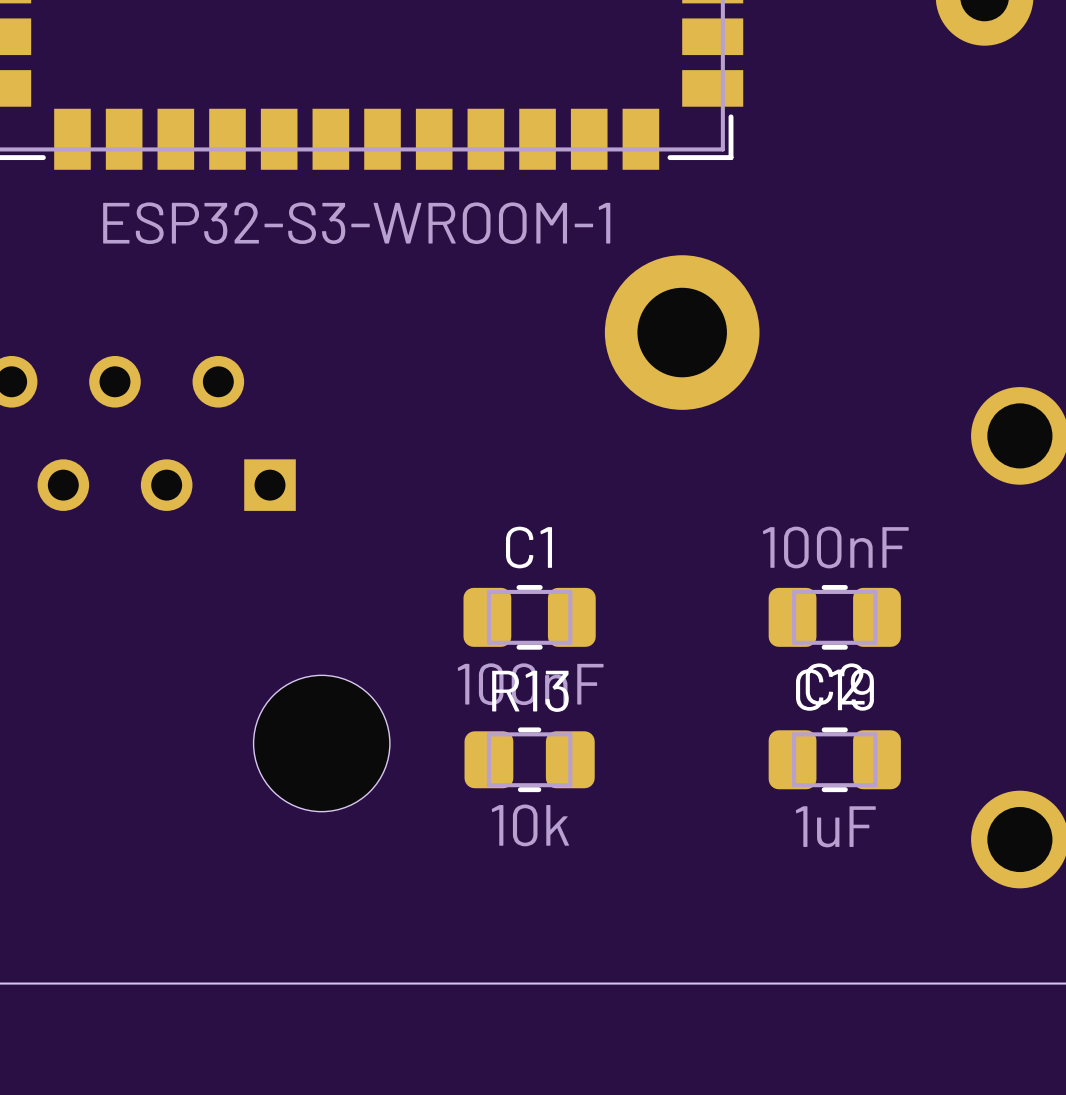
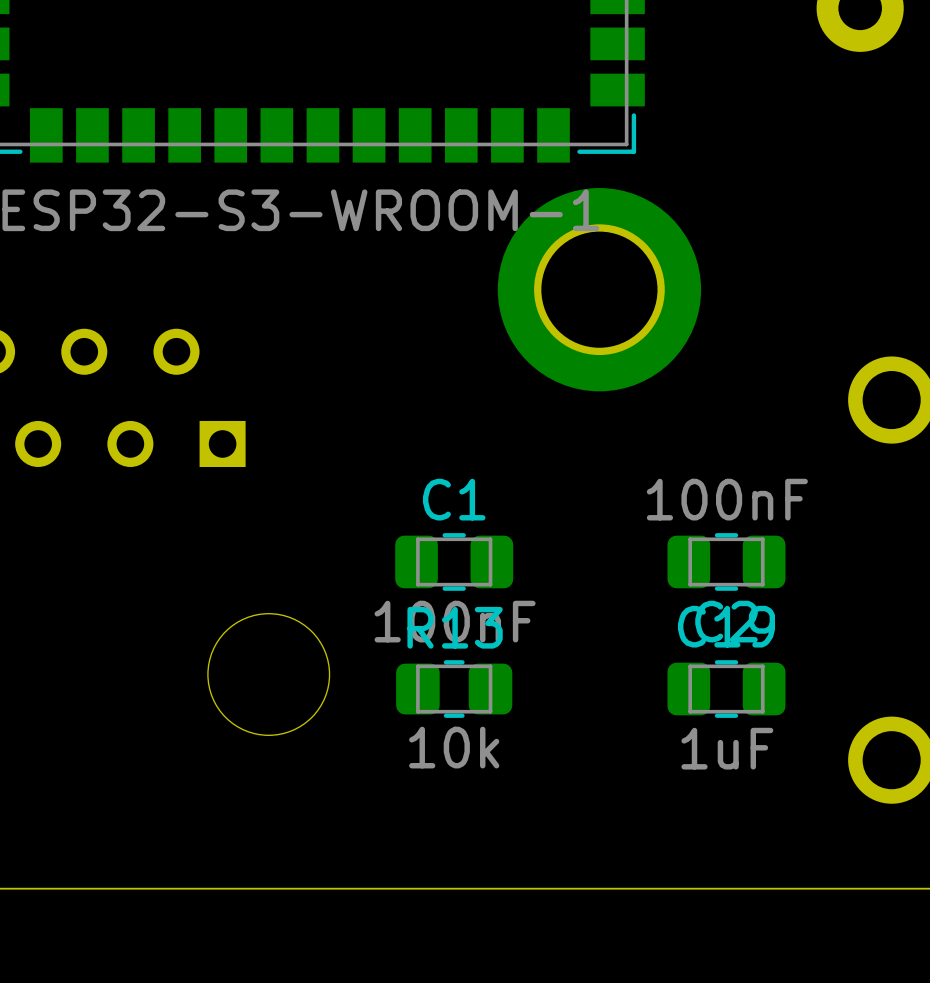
part footprint: [604, 255, 760, 410] -> [497, 188, 702, 392]

